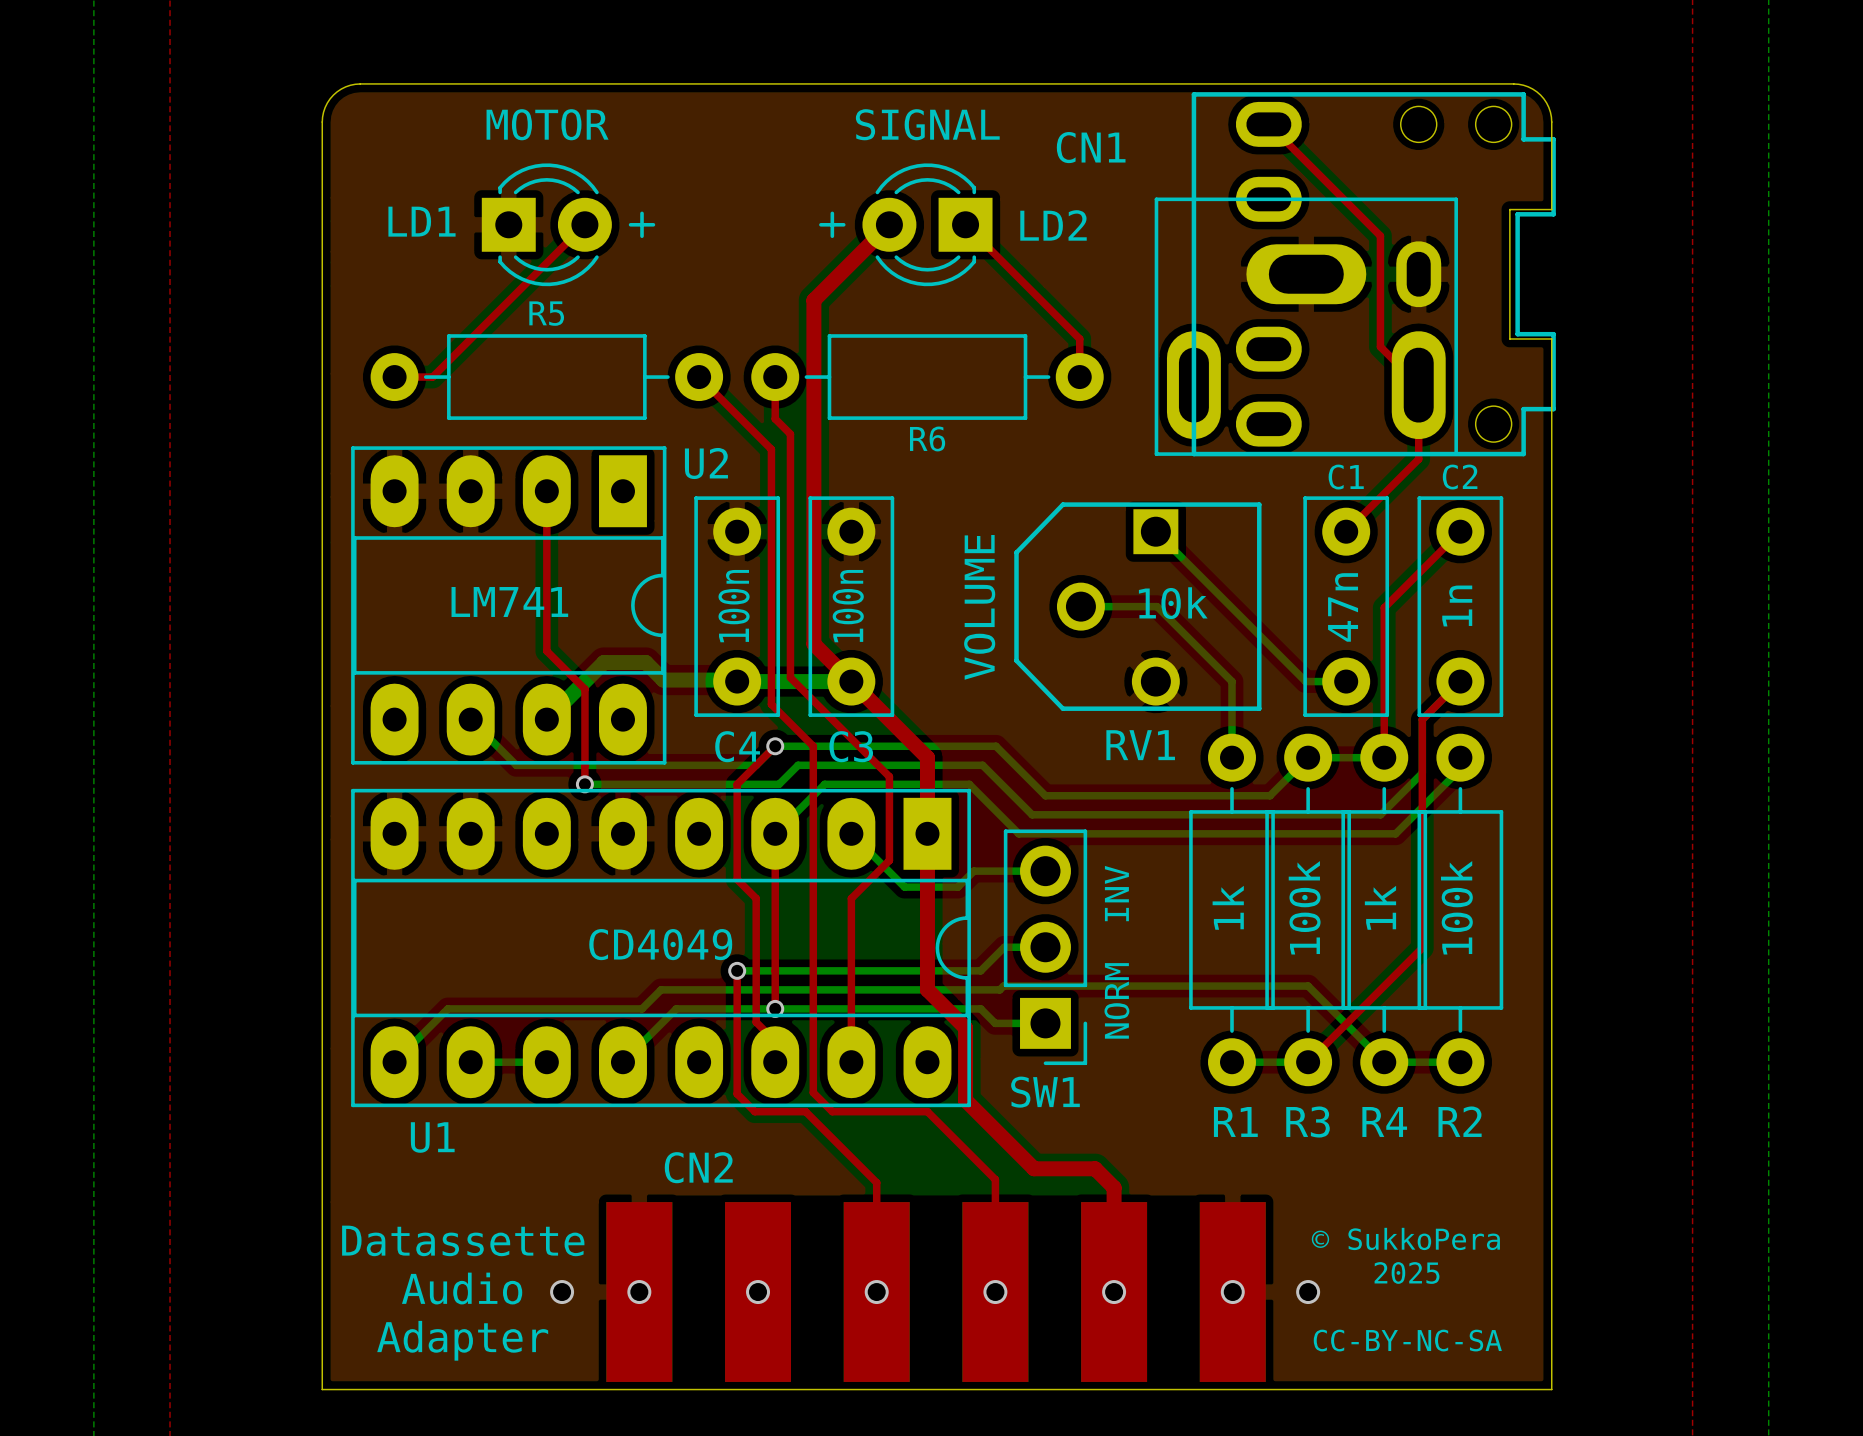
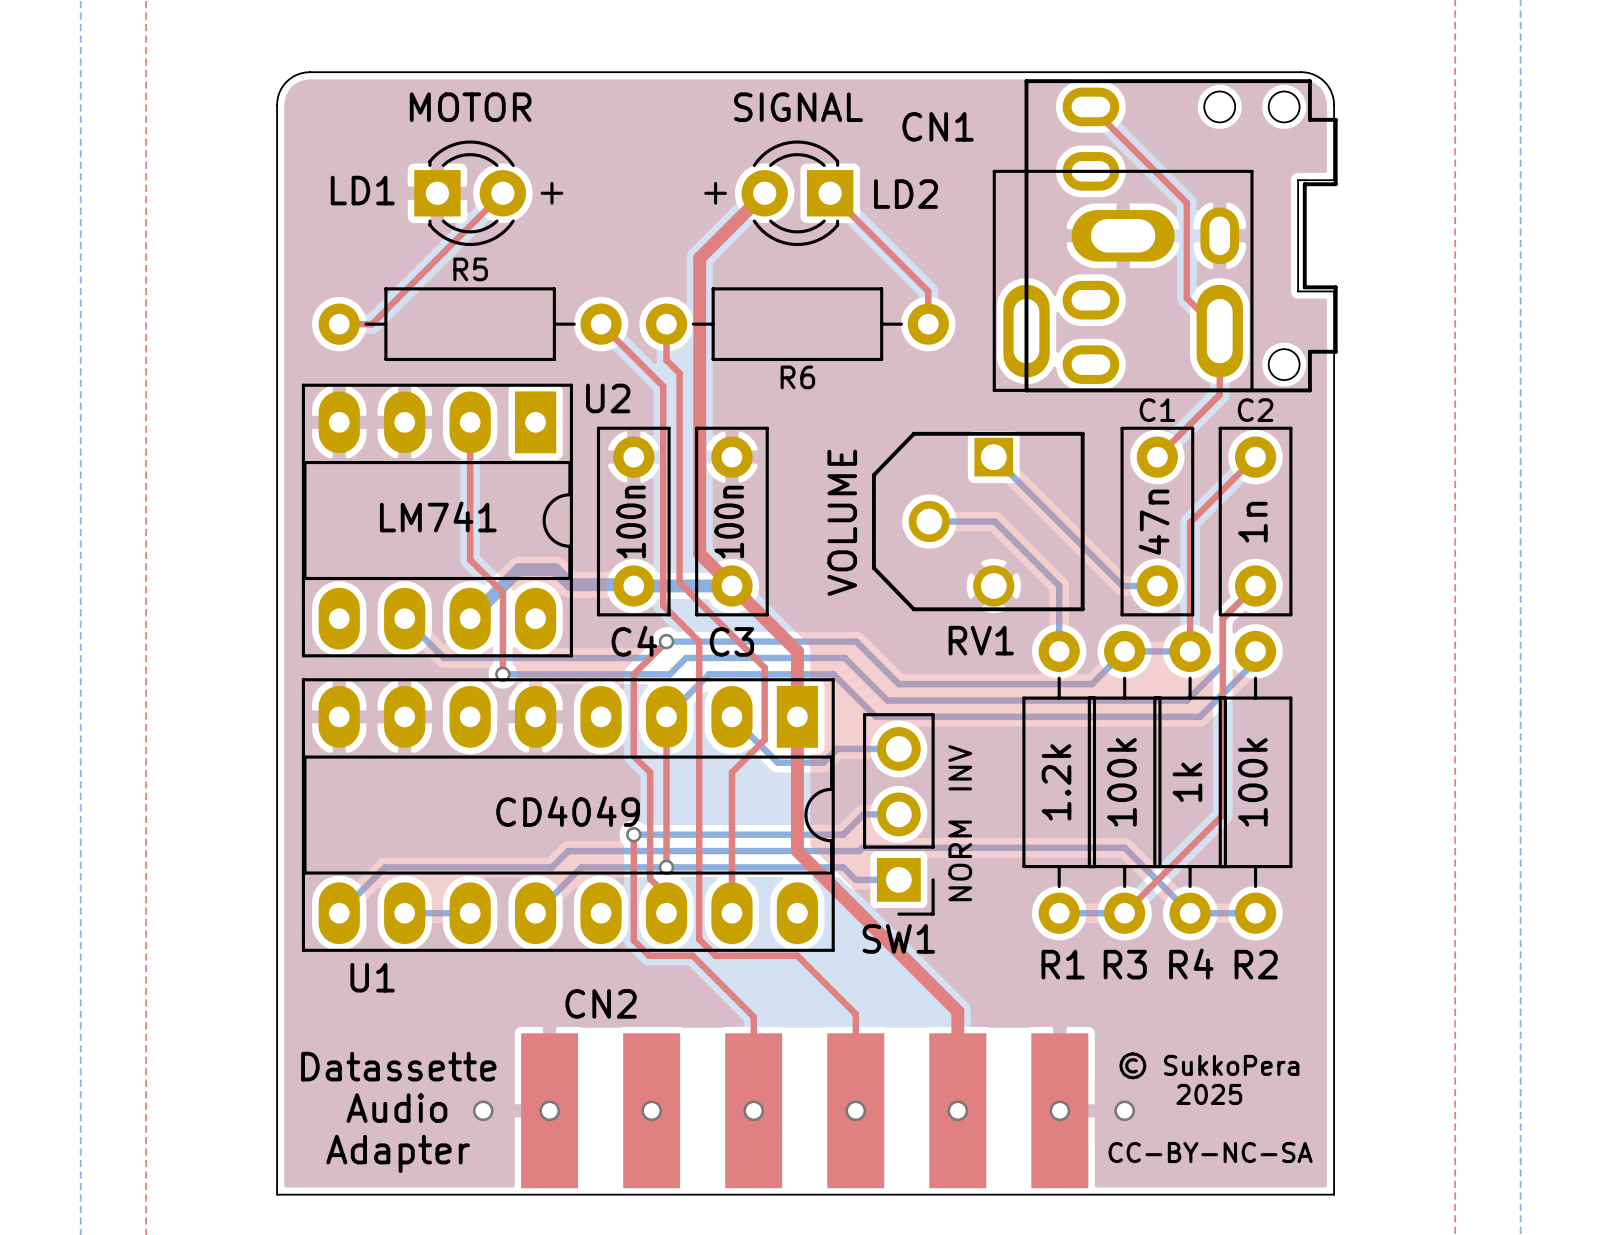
RV1 value: 10k (1173, 603) -> none
R1 value: 1k (1228, 907) -> 1.2k (1056, 782)
top track: (965, 1027) (965, 1100) (1034, 1168) (1095, 1168) (1114, 1187) -> (830, 883) (957, 1011) (957, 1021)

